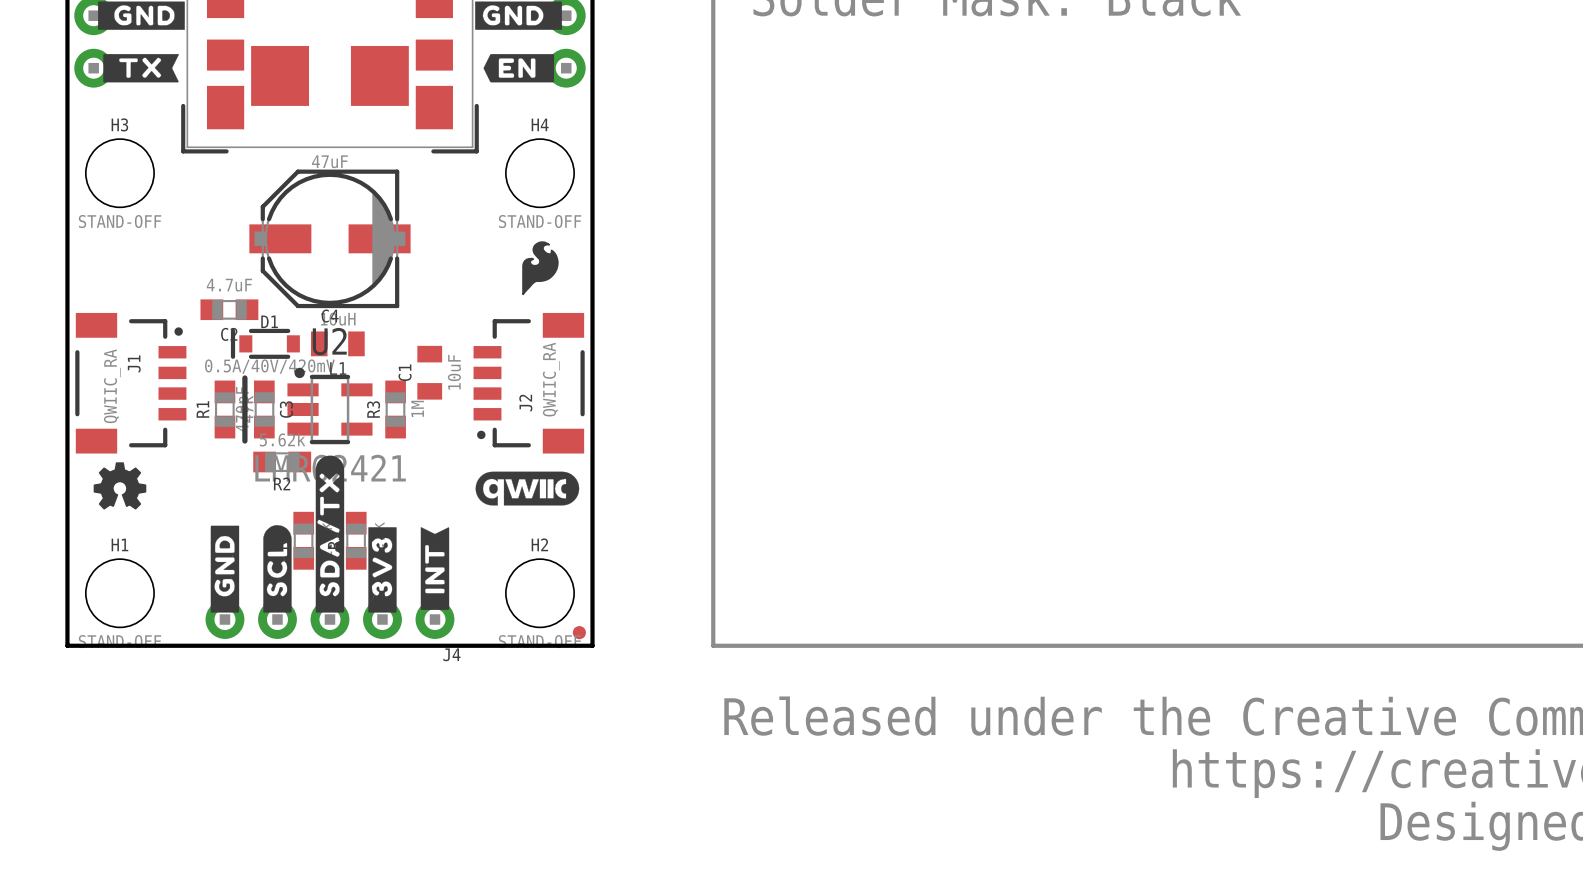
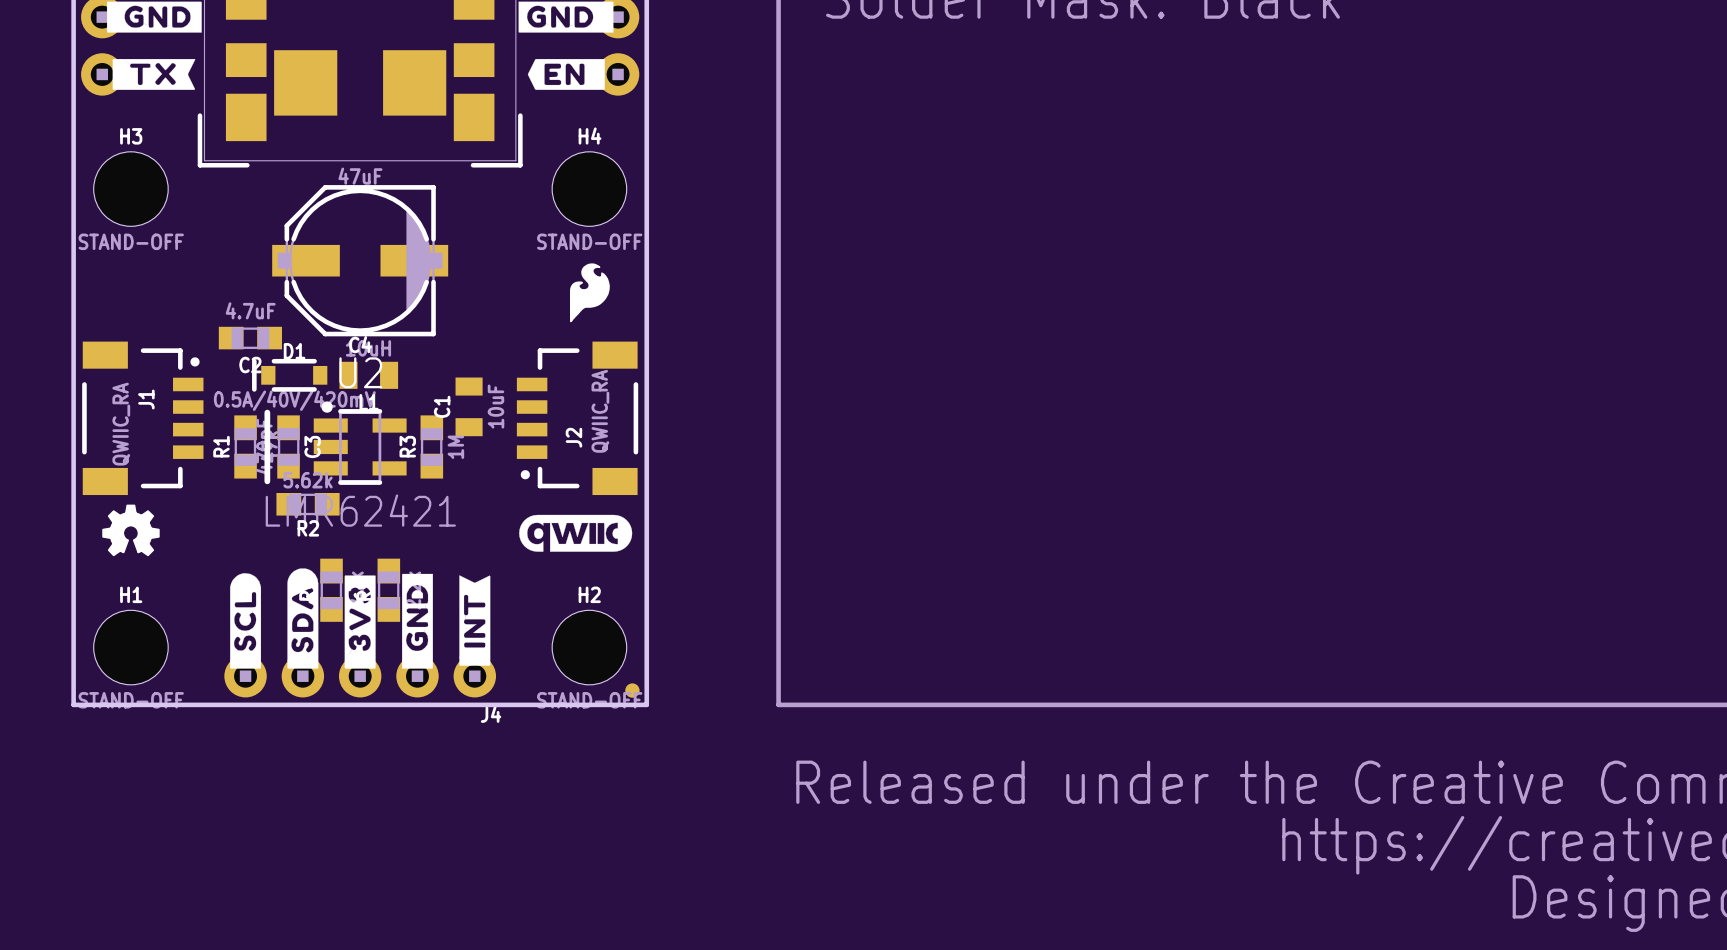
drawing: [315, 455, 345, 613] -> none
drawing: none -> [287, 568, 319, 669]
drawing position: (277, 568) -> (245, 620)
drawing position: (224, 569) -> (417, 621)
drawing position: (382, 569) -> (360, 622)

